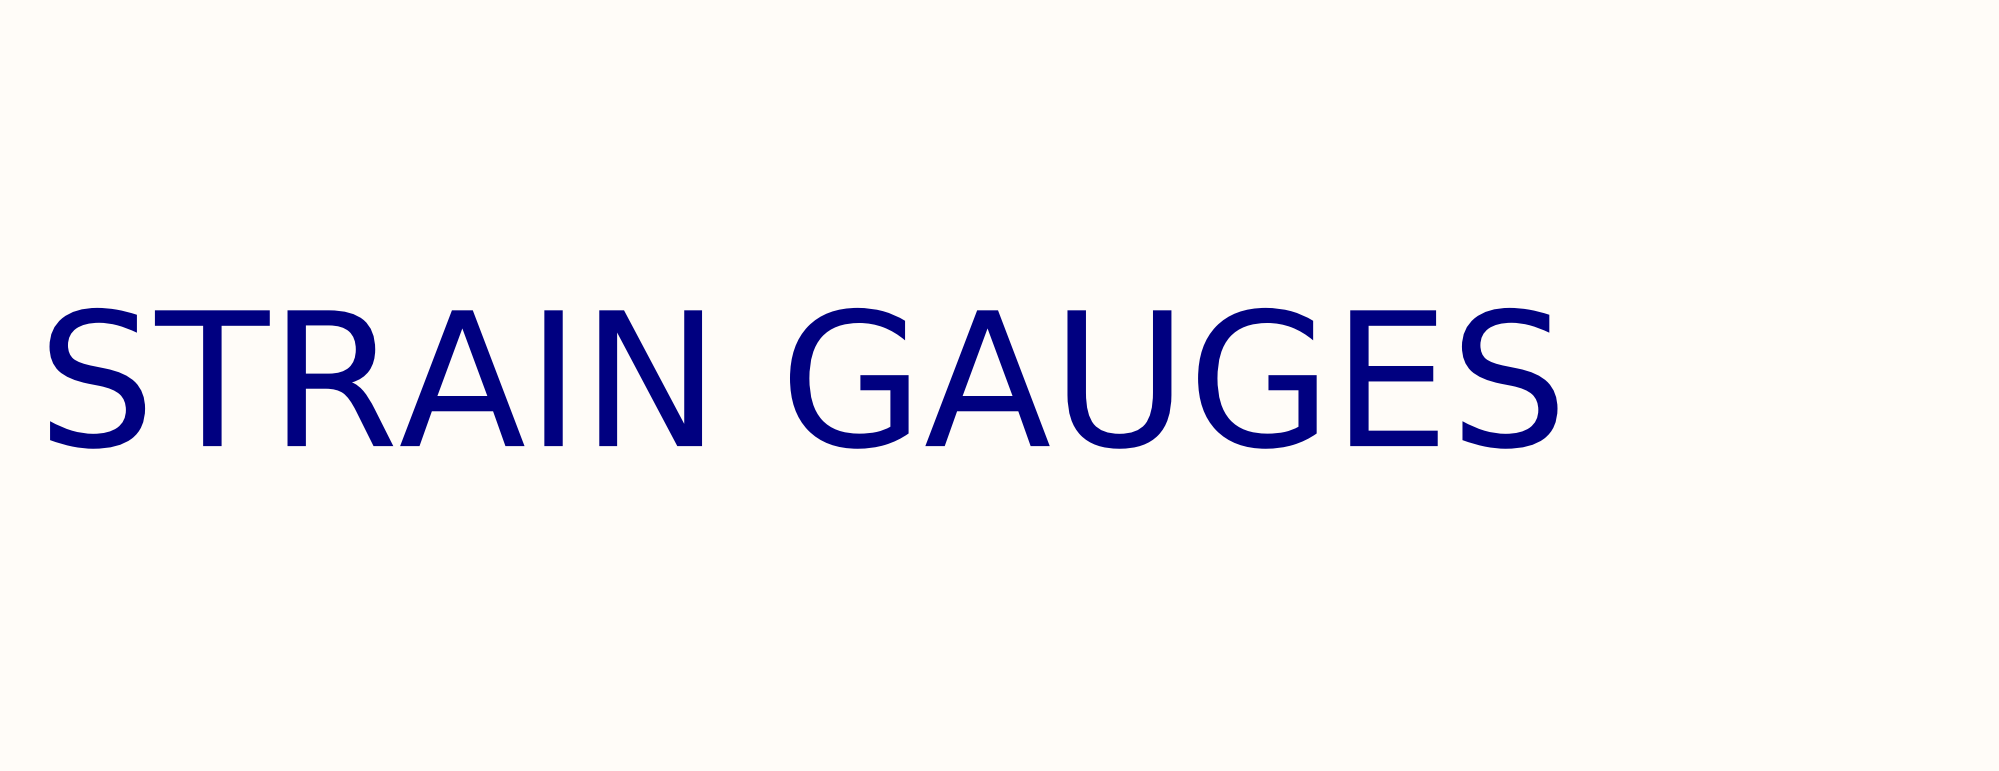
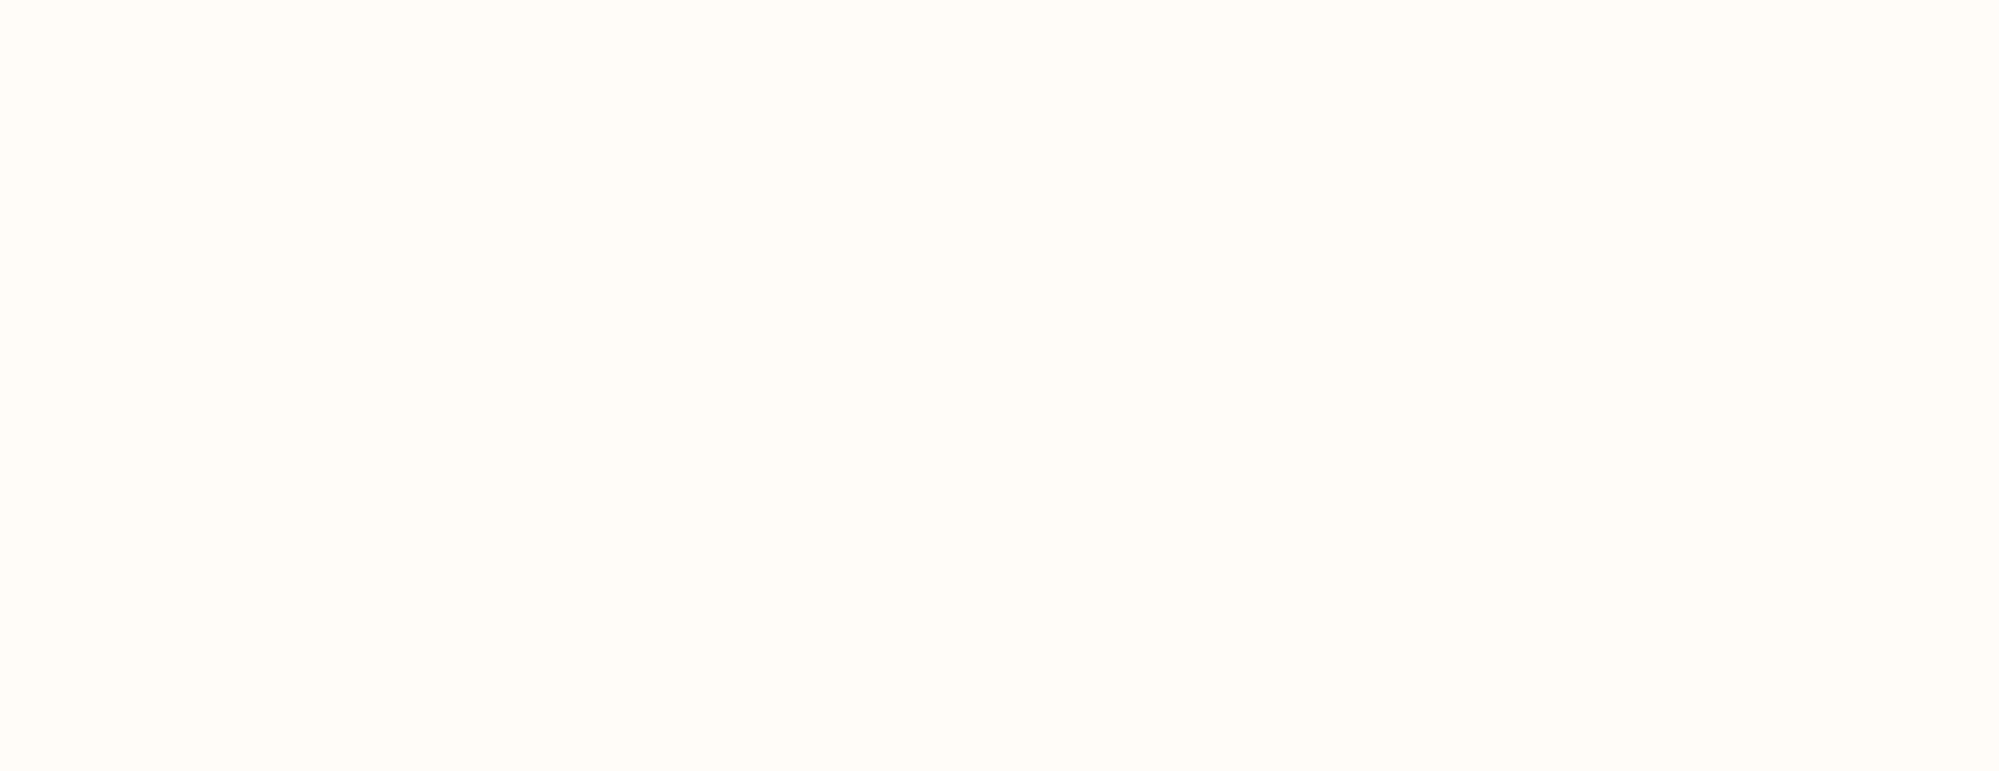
text: STRAIN GAUGES (803, 378) -> none

